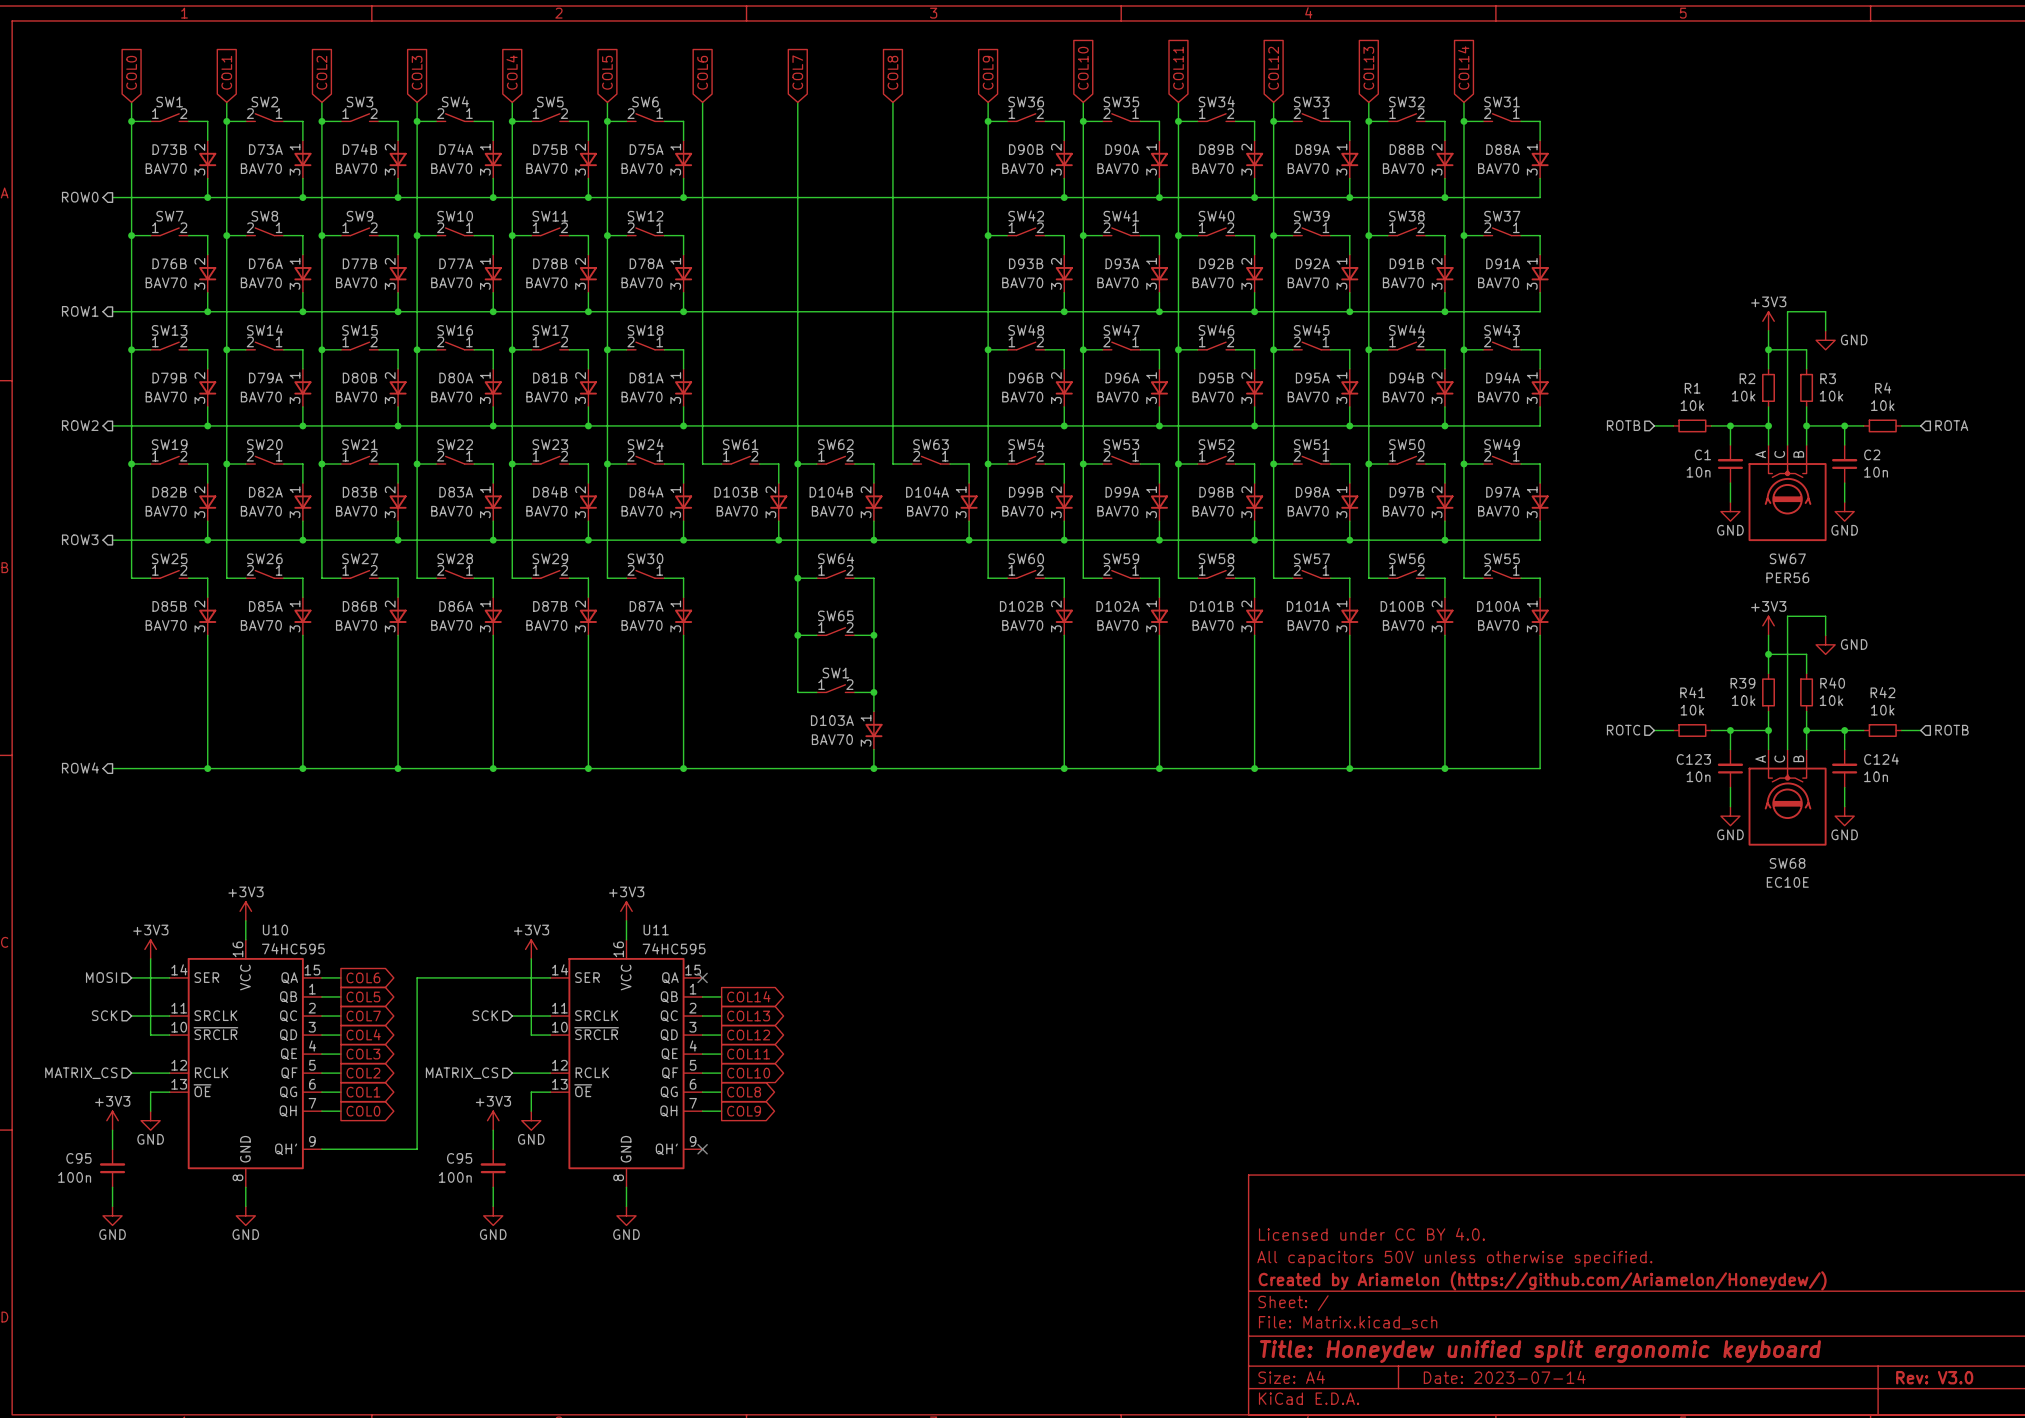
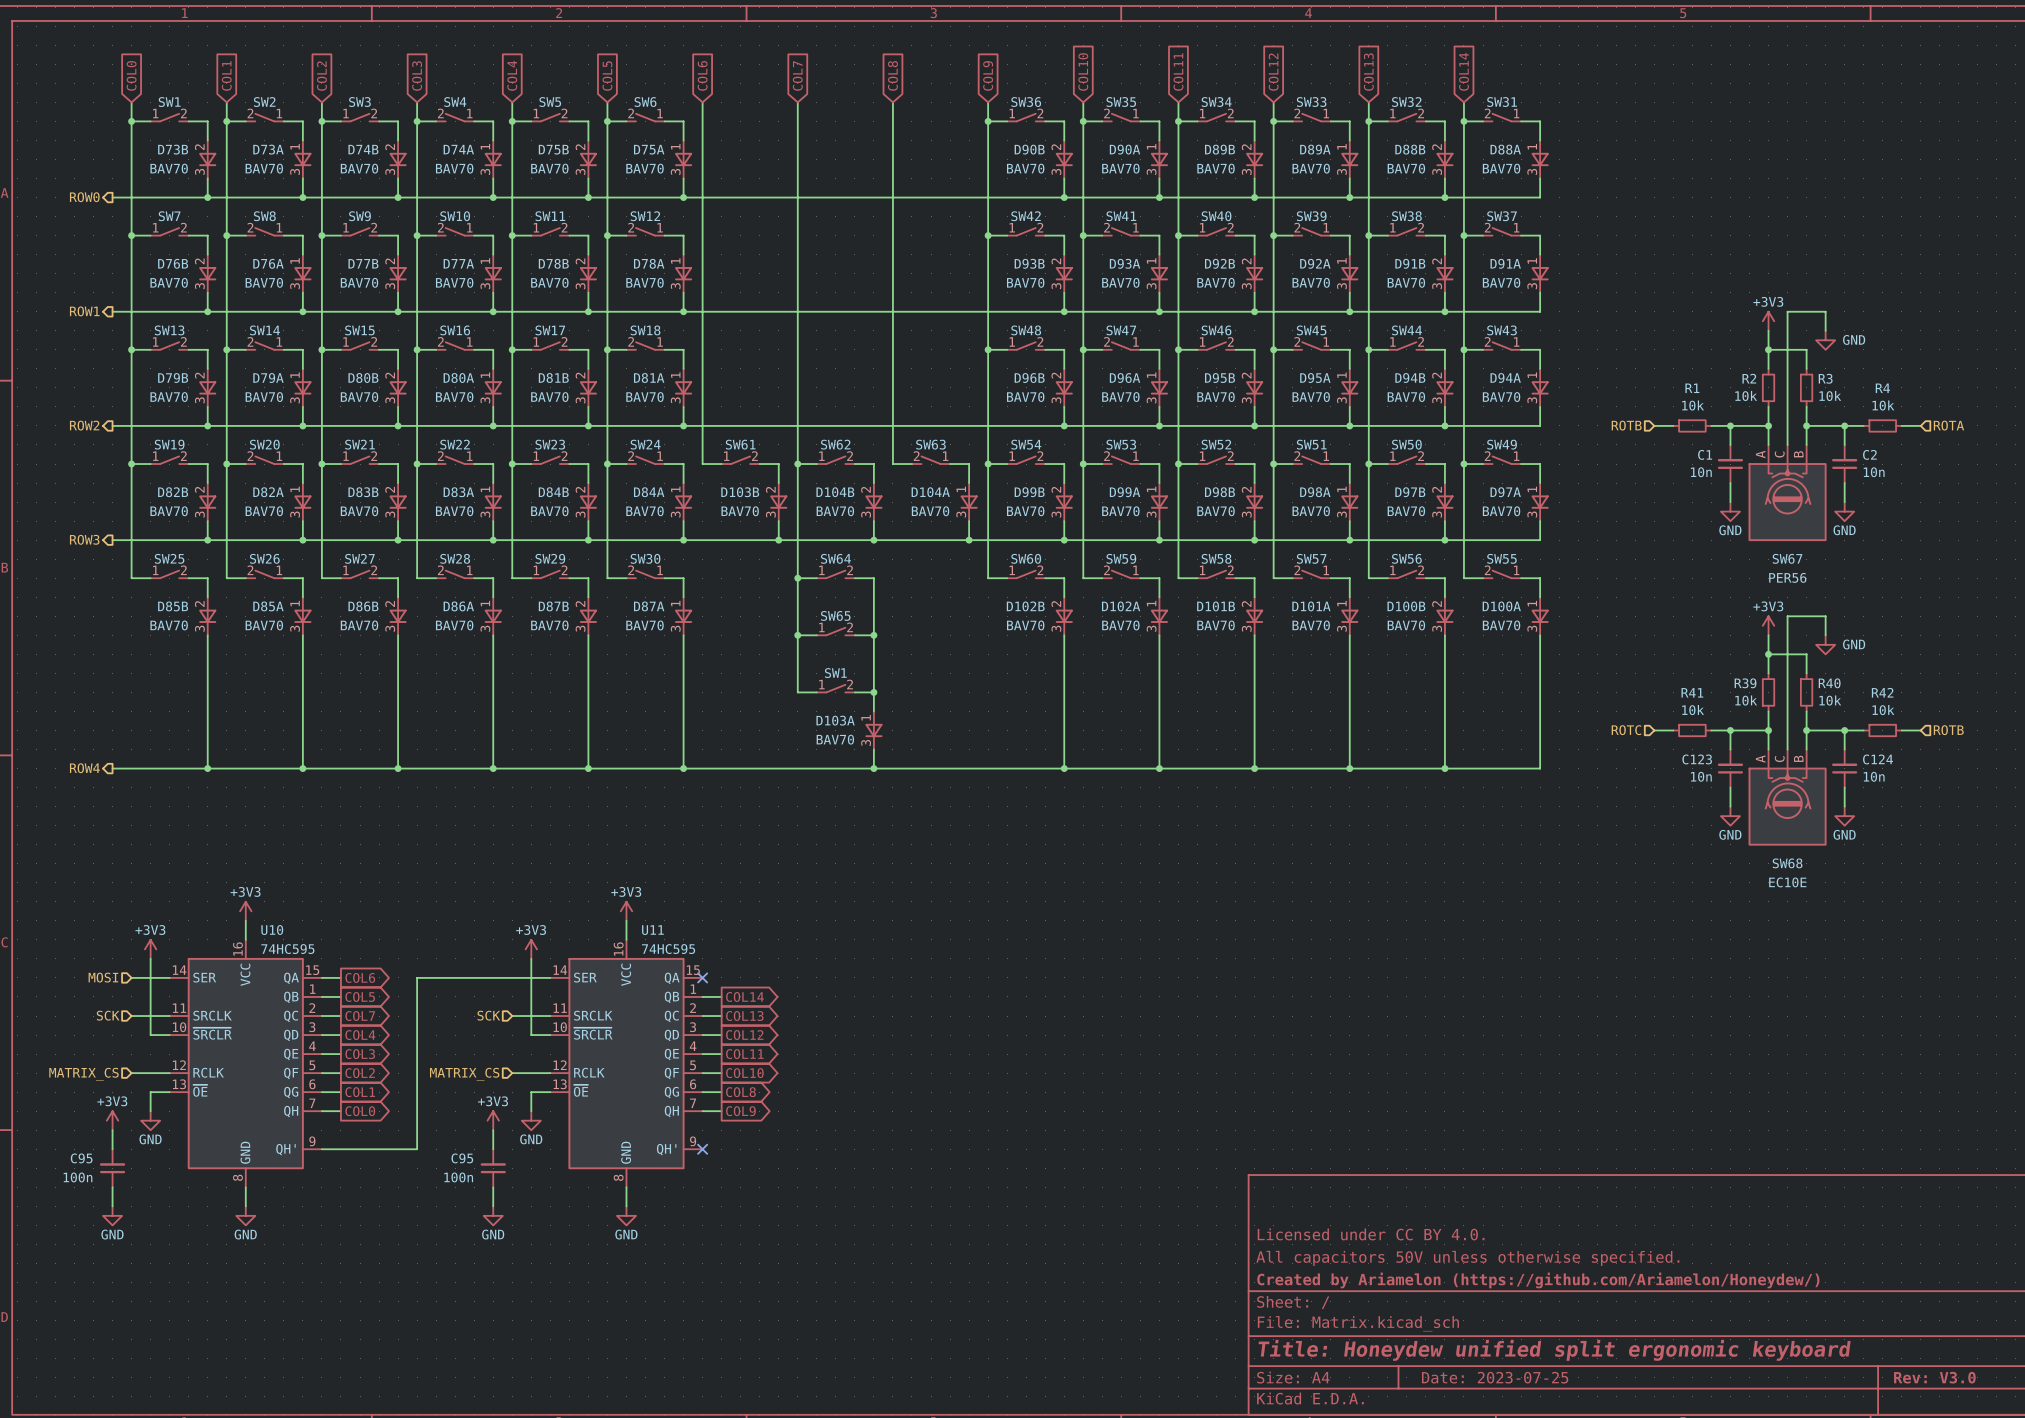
title block: Date: 2023-07-14 (1504, 1377) -> Date: 2023-07-25 (1495, 1377)

